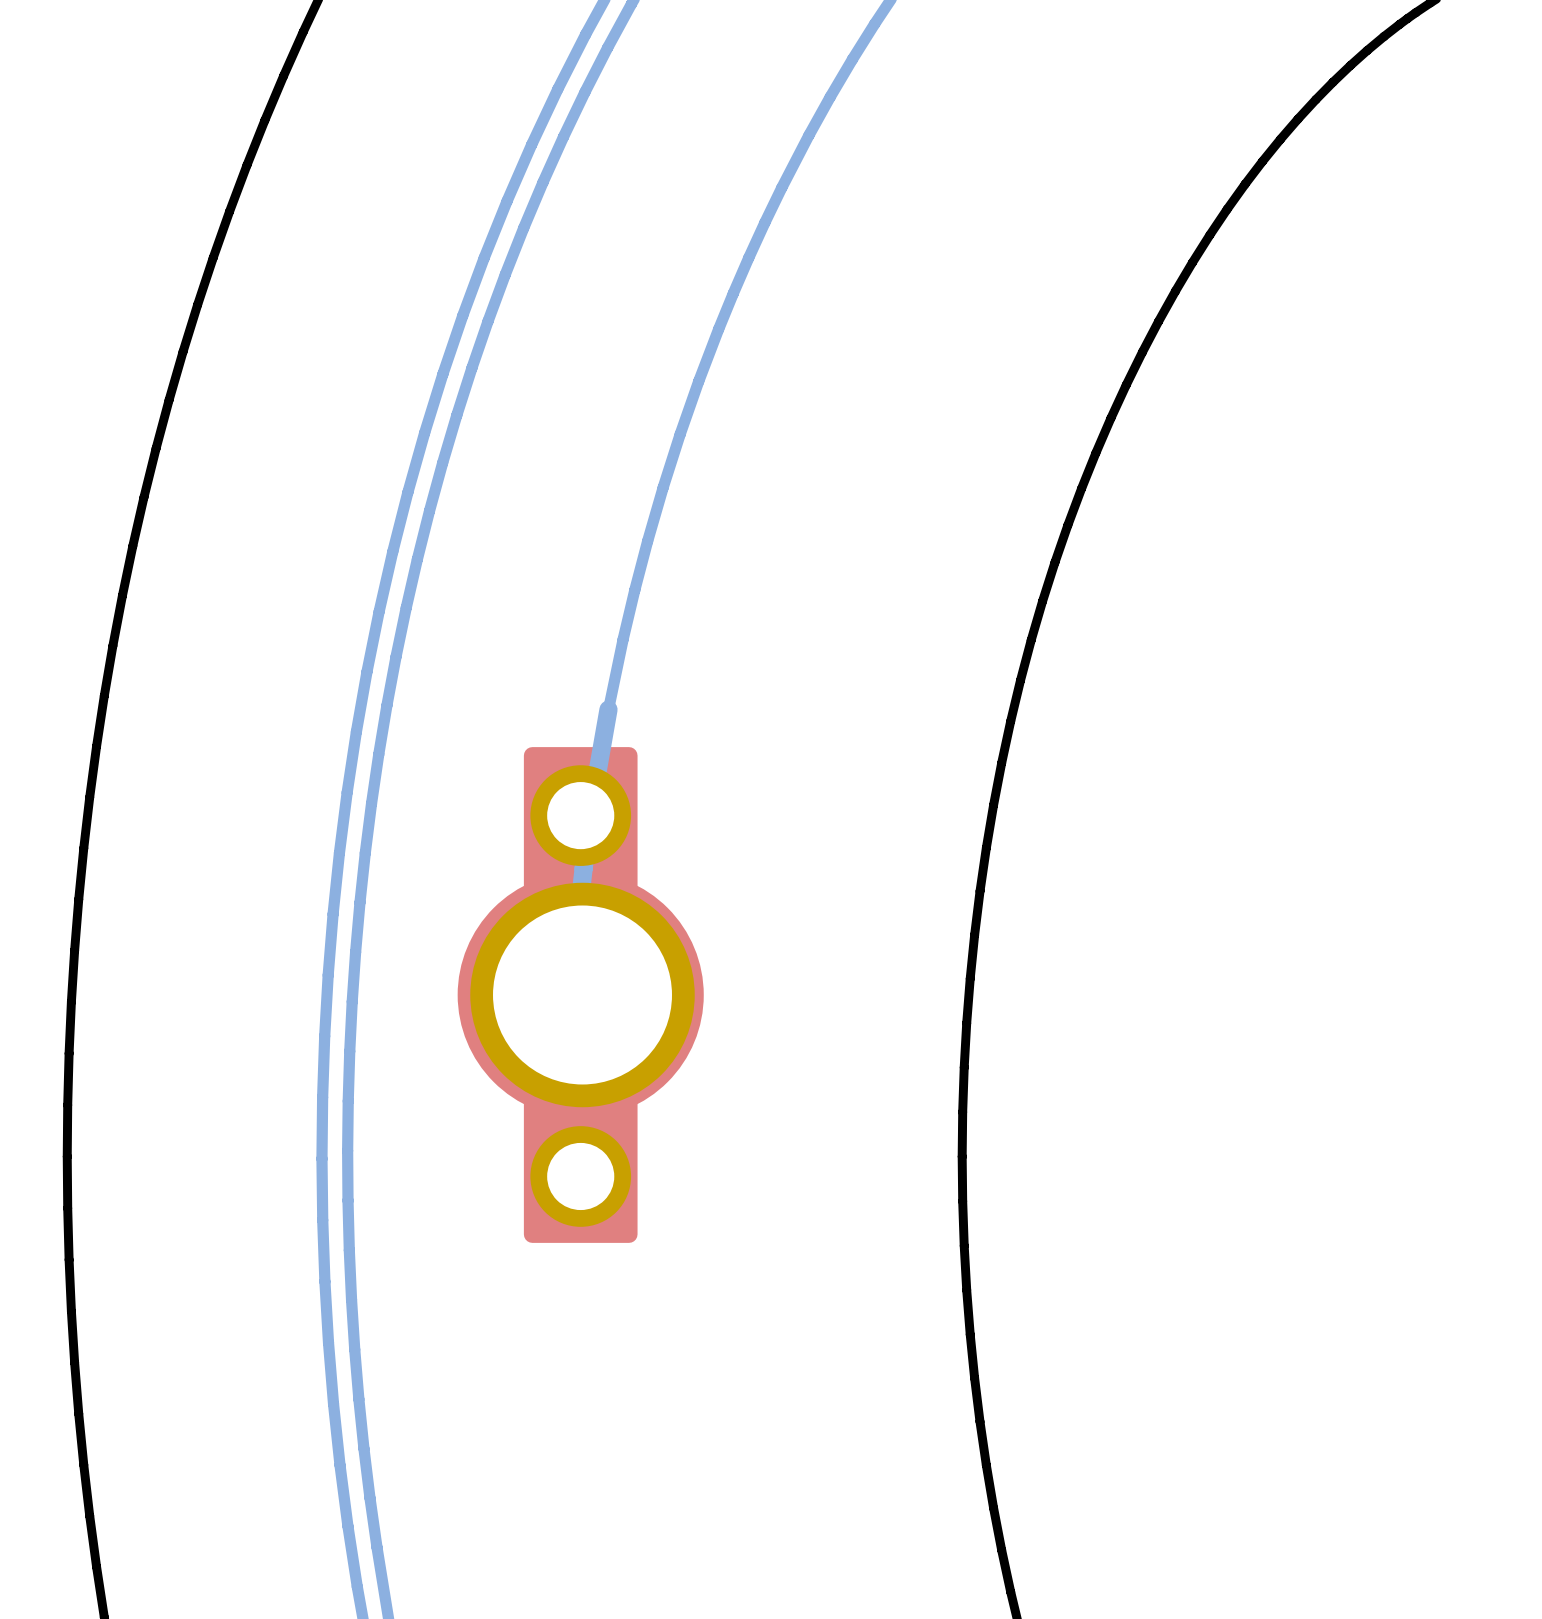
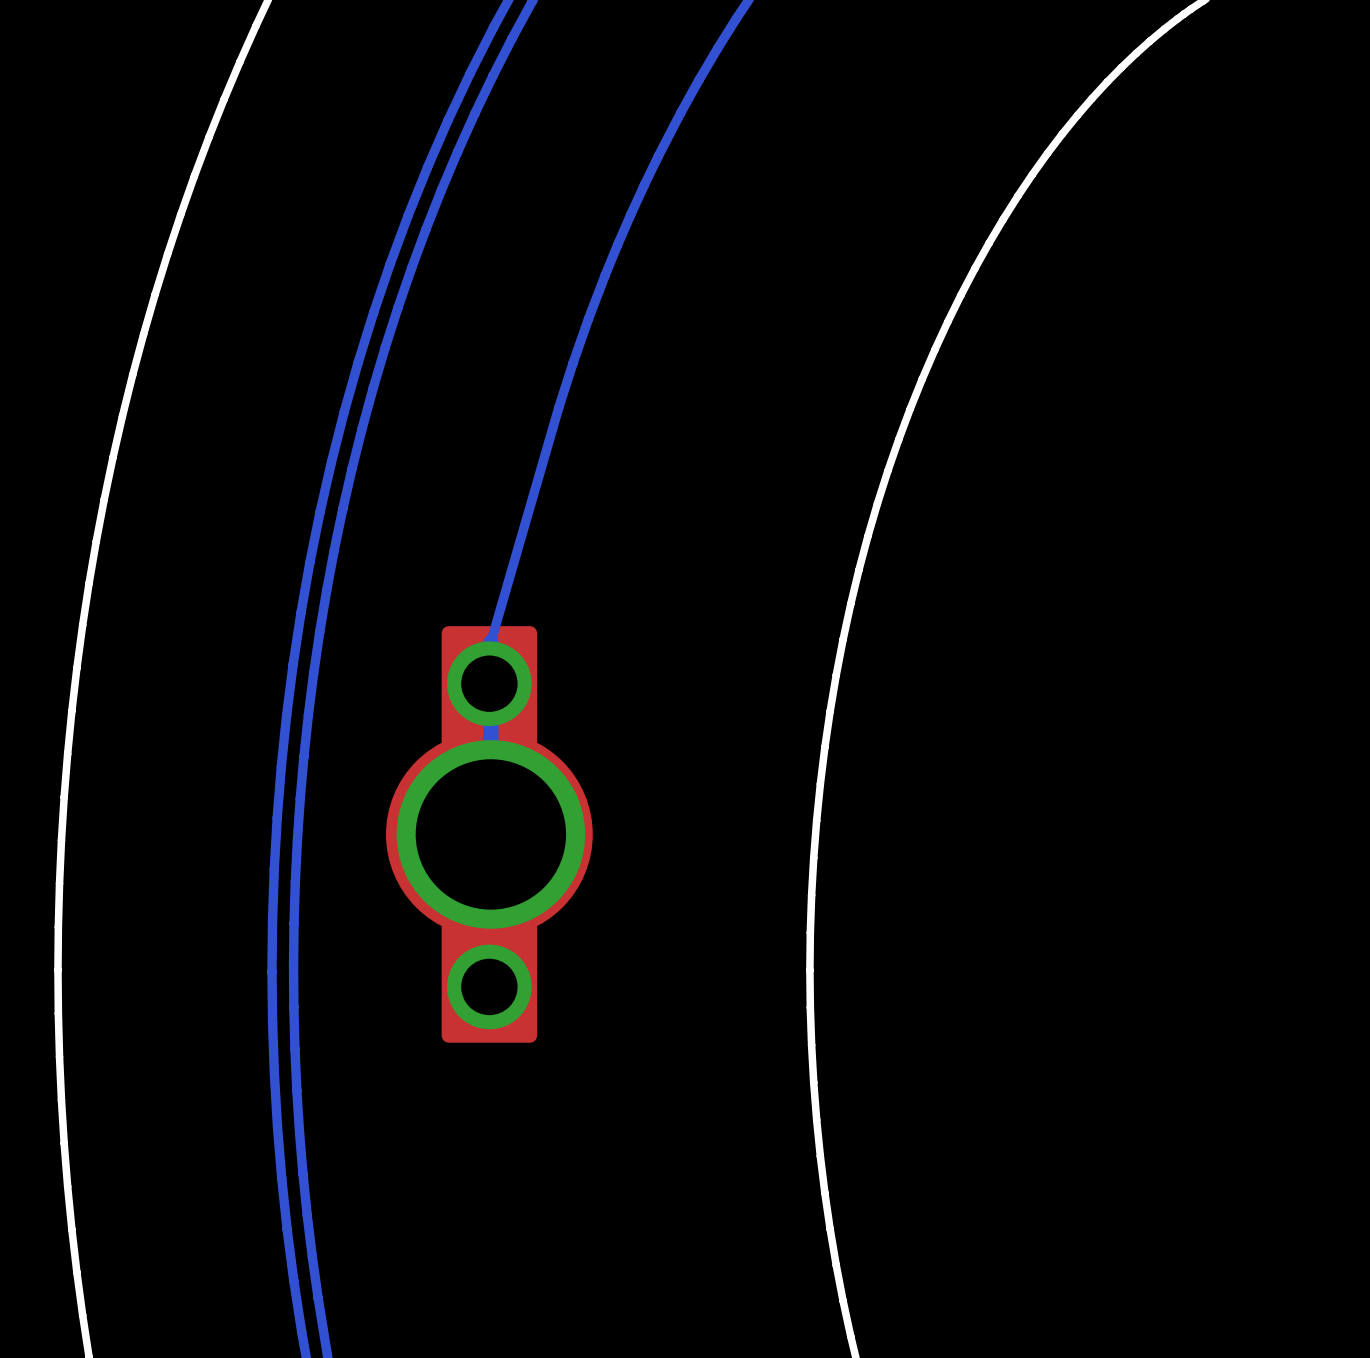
bottom track: (647, 541) (623, 639) (608, 709) (589, 824) (577, 925) (577, 990) (582, 994) -> (545, 453) (490, 642) (490, 834)

